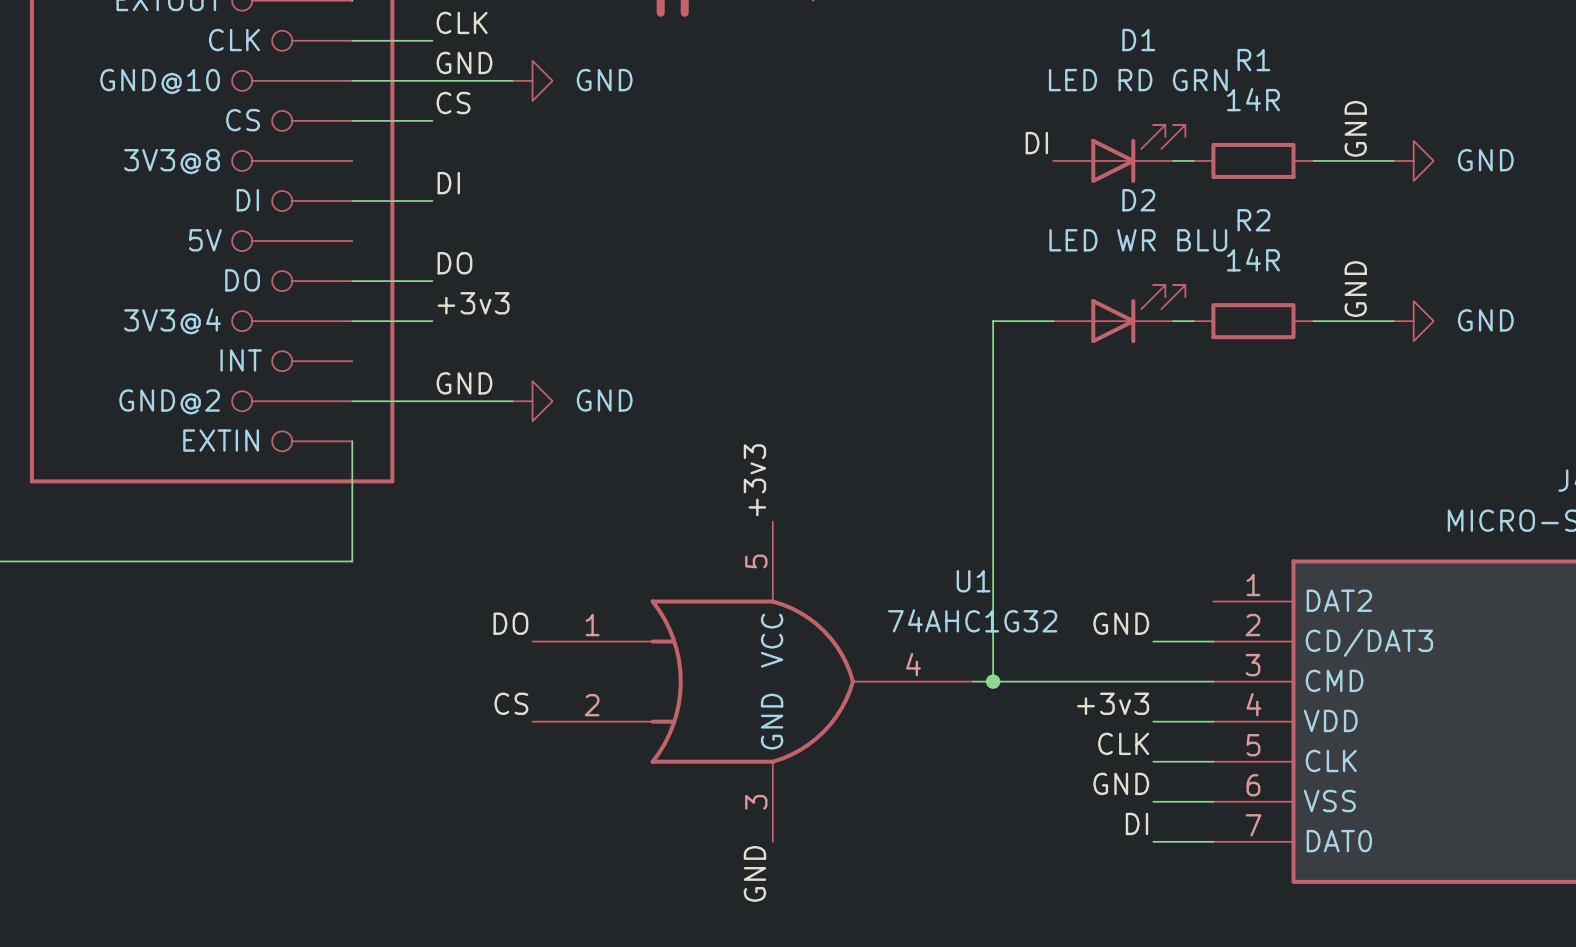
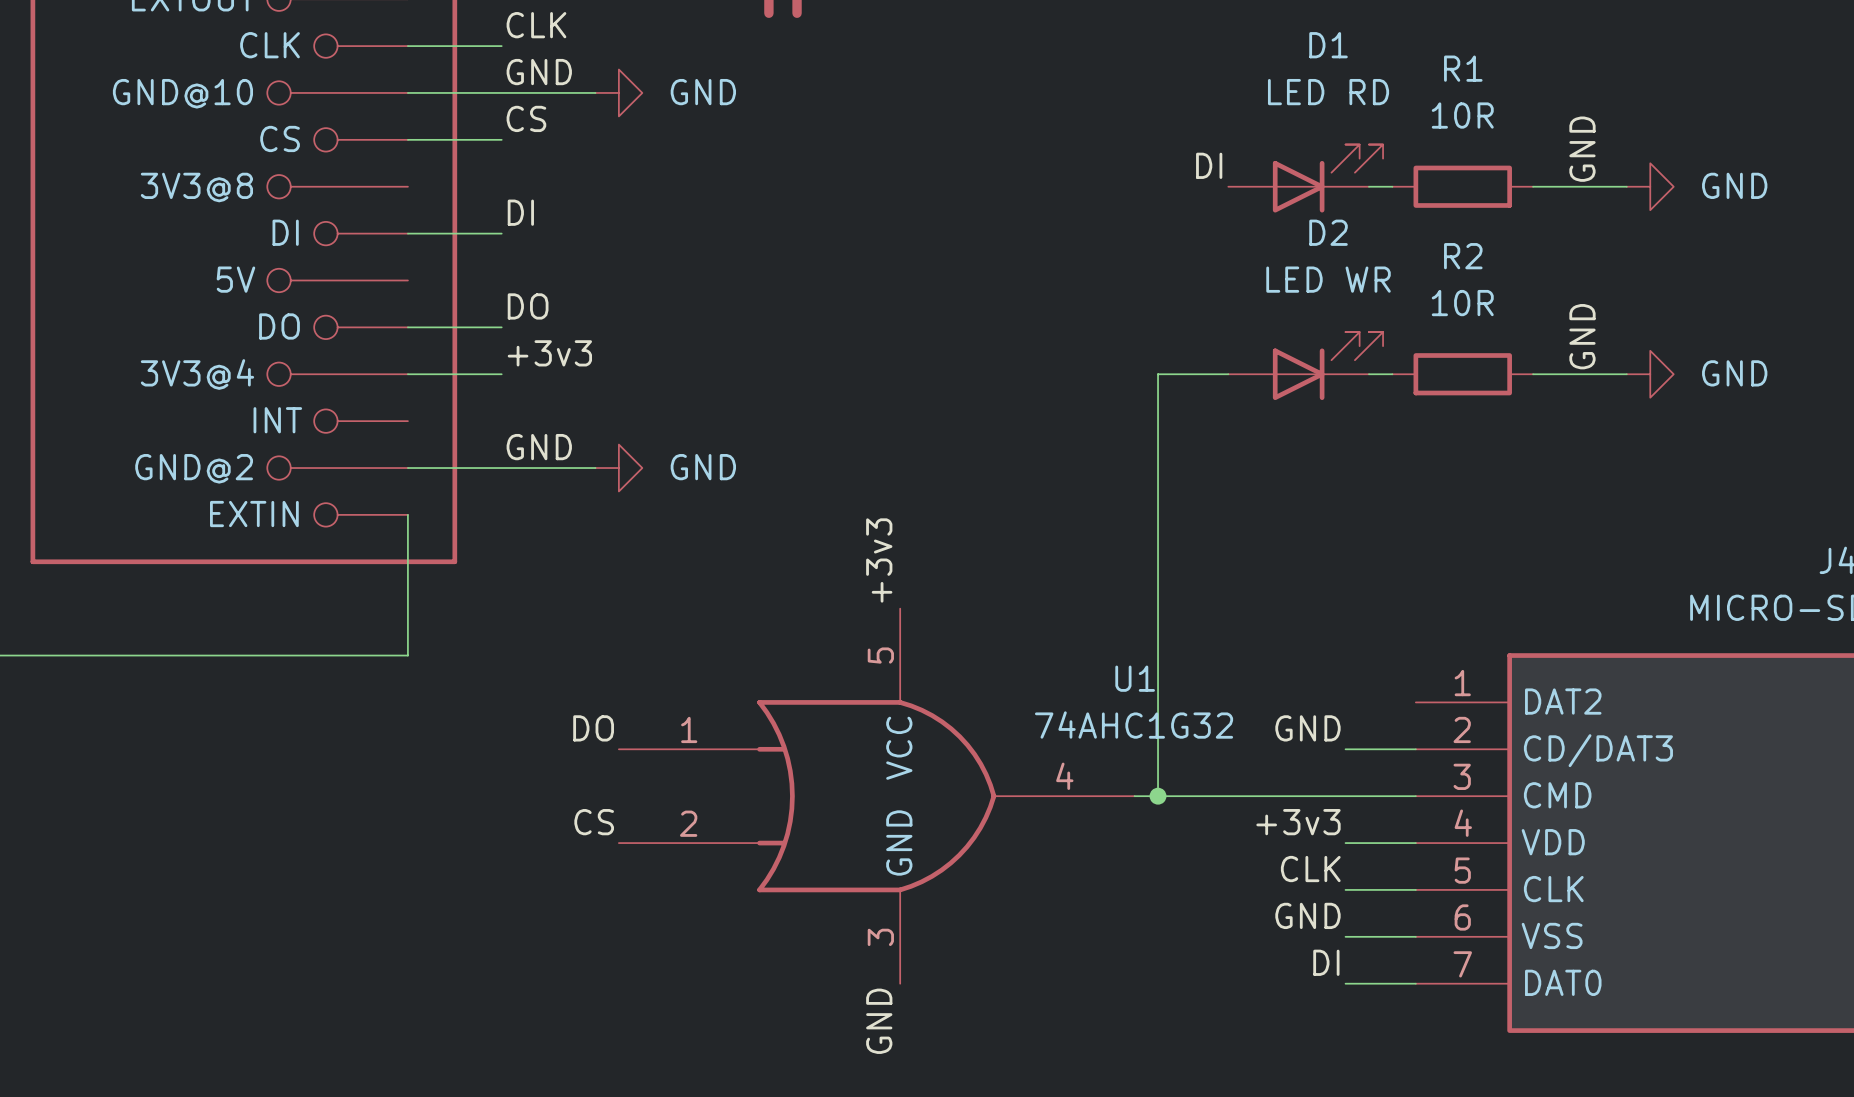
D1 value: LED RD GRN (1138, 80) -> LED RD (1328, 92)
R1 value: 14R (1253, 99) -> 10R (1462, 115)
D2 value: LED WR BLU (1138, 240) -> LED WR (1328, 279)
R2 value: 14R (1253, 259) -> 10R (1462, 303)

